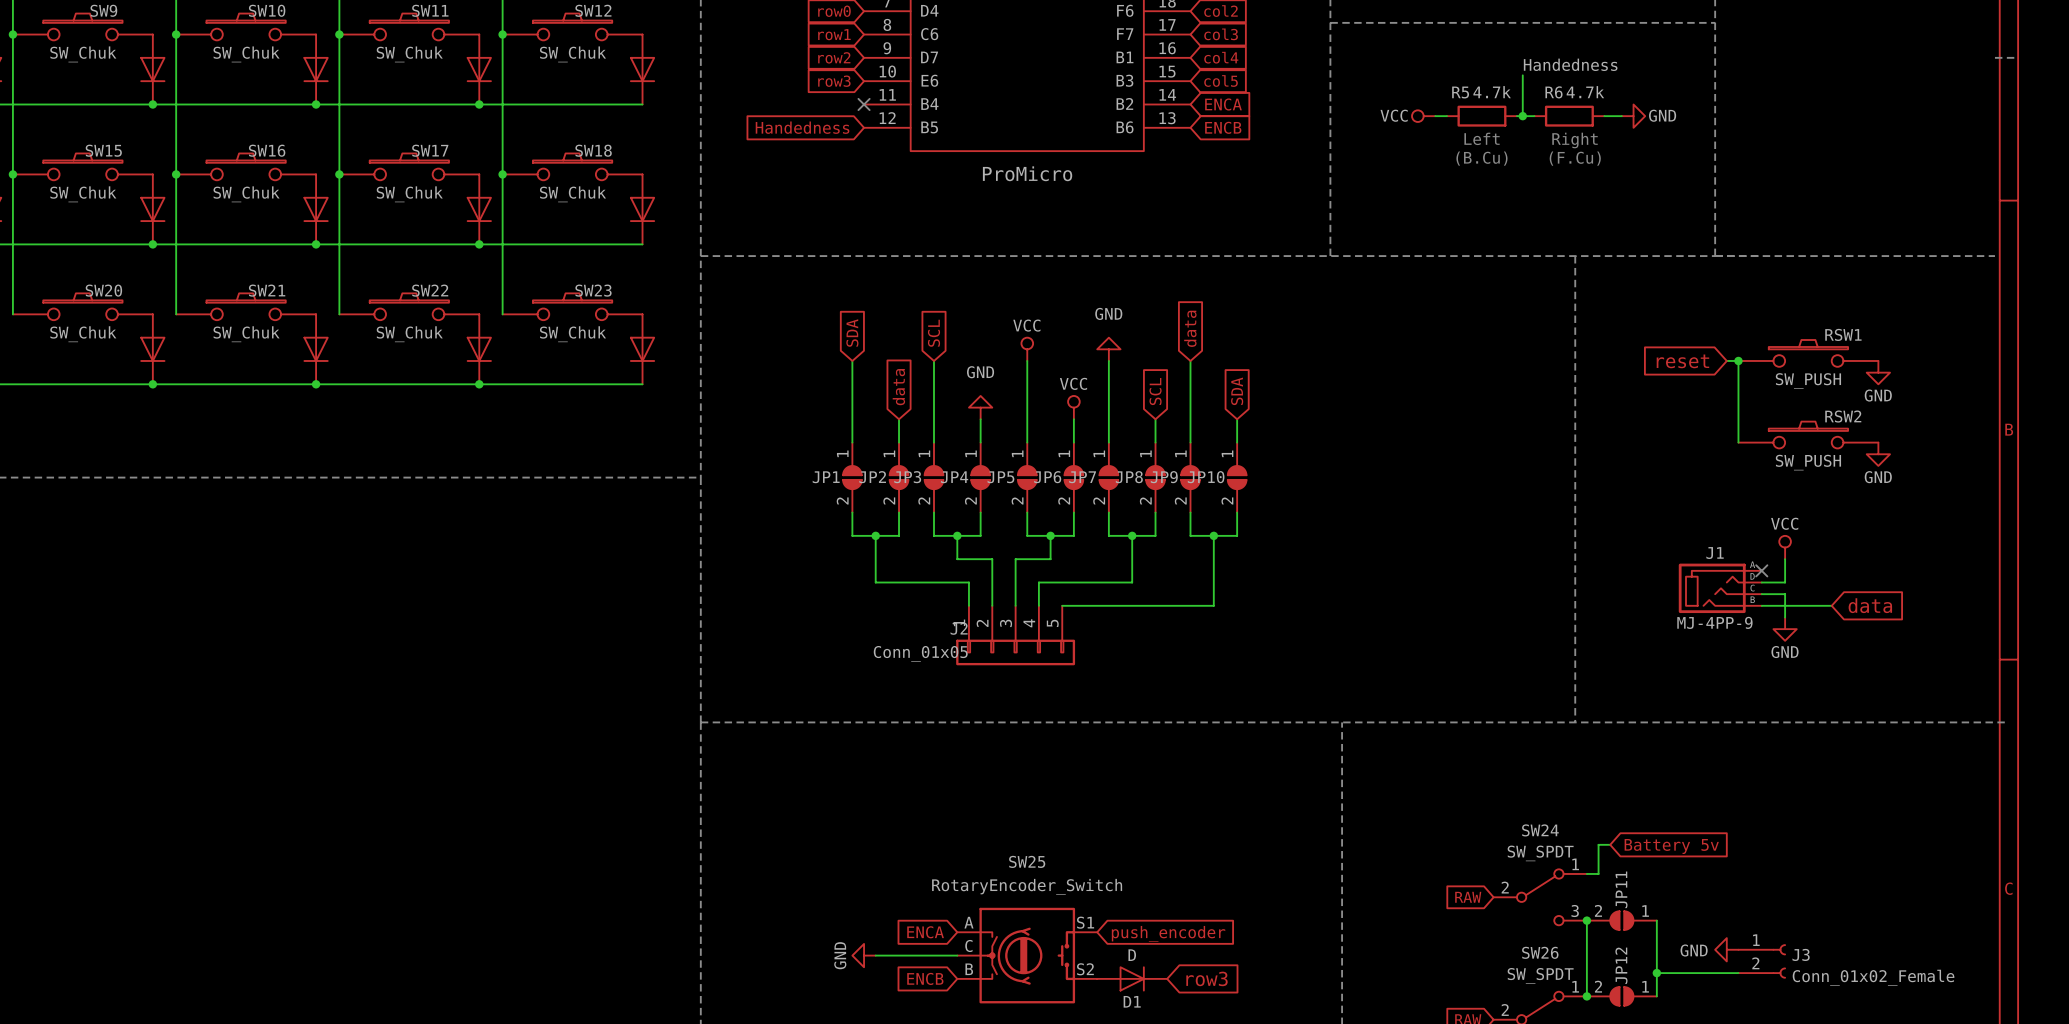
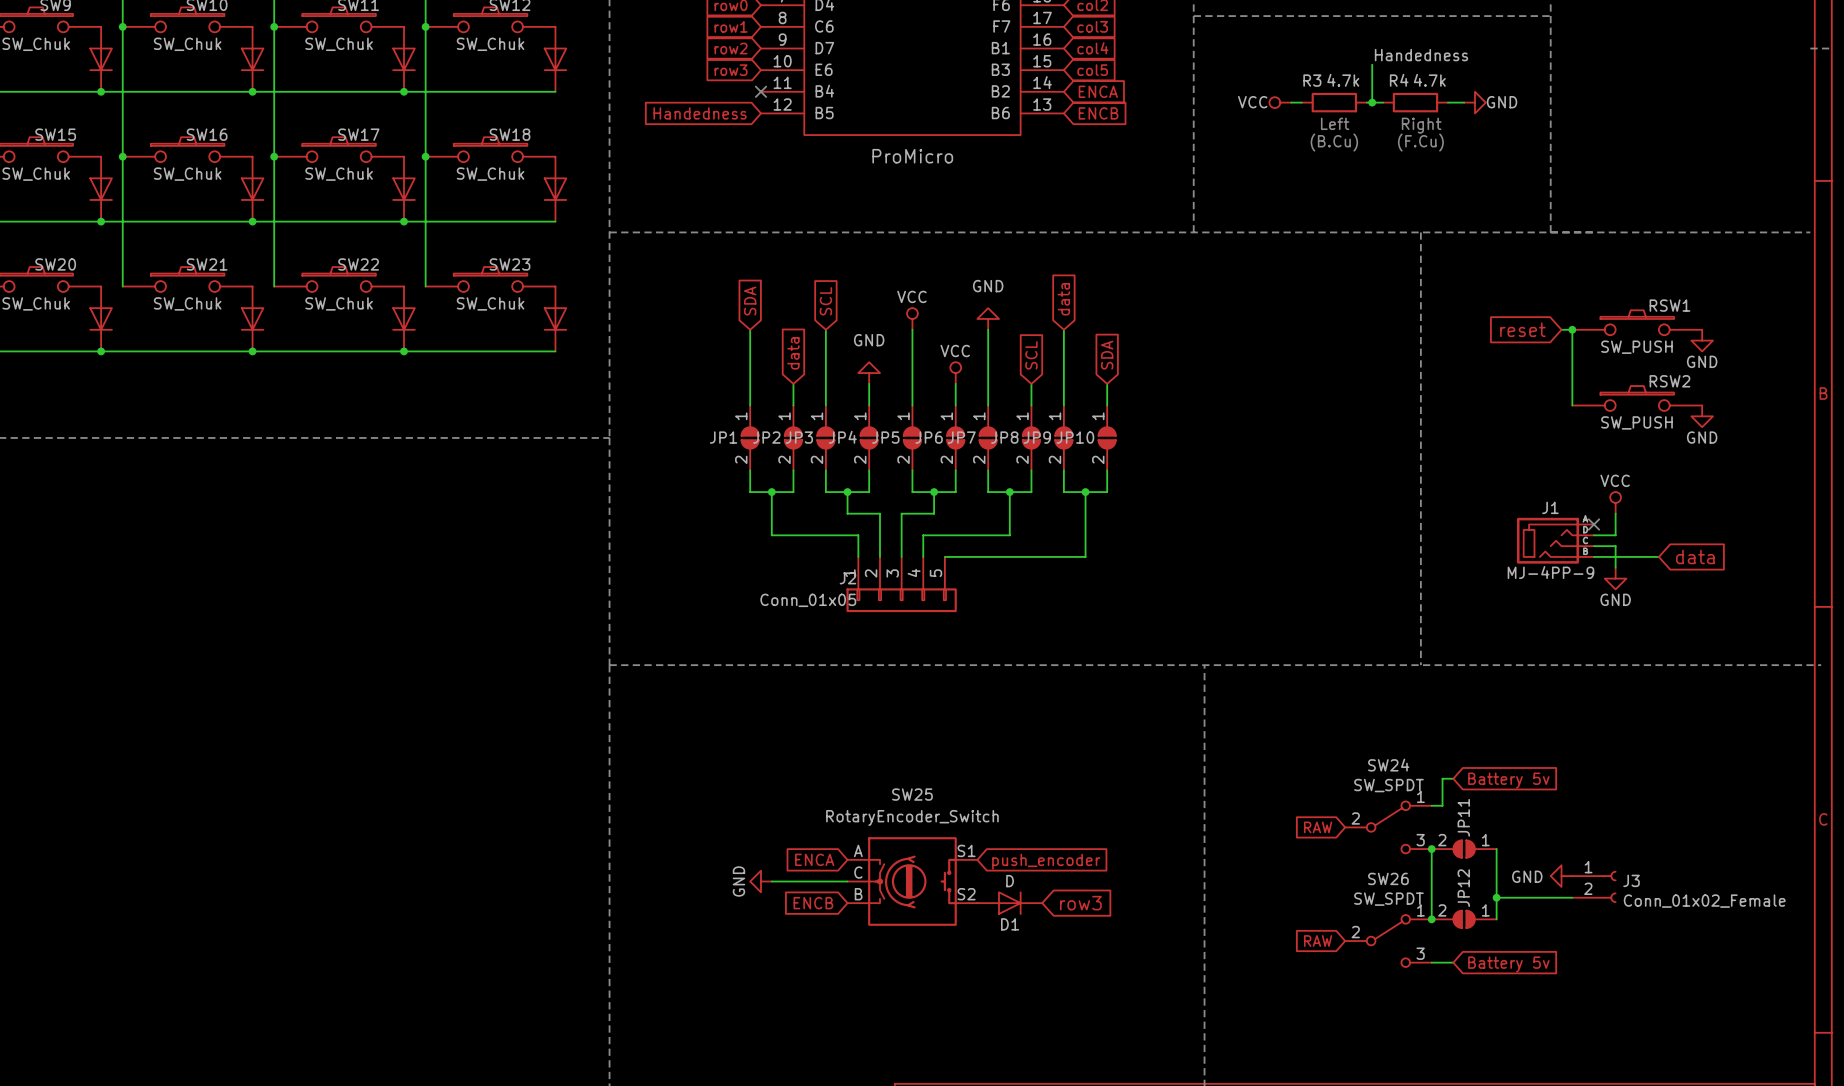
R5 name: R5 (1460, 92) -> R3 (1312, 80)
R6 name: R6 (1553, 92) -> R4 (1399, 80)

